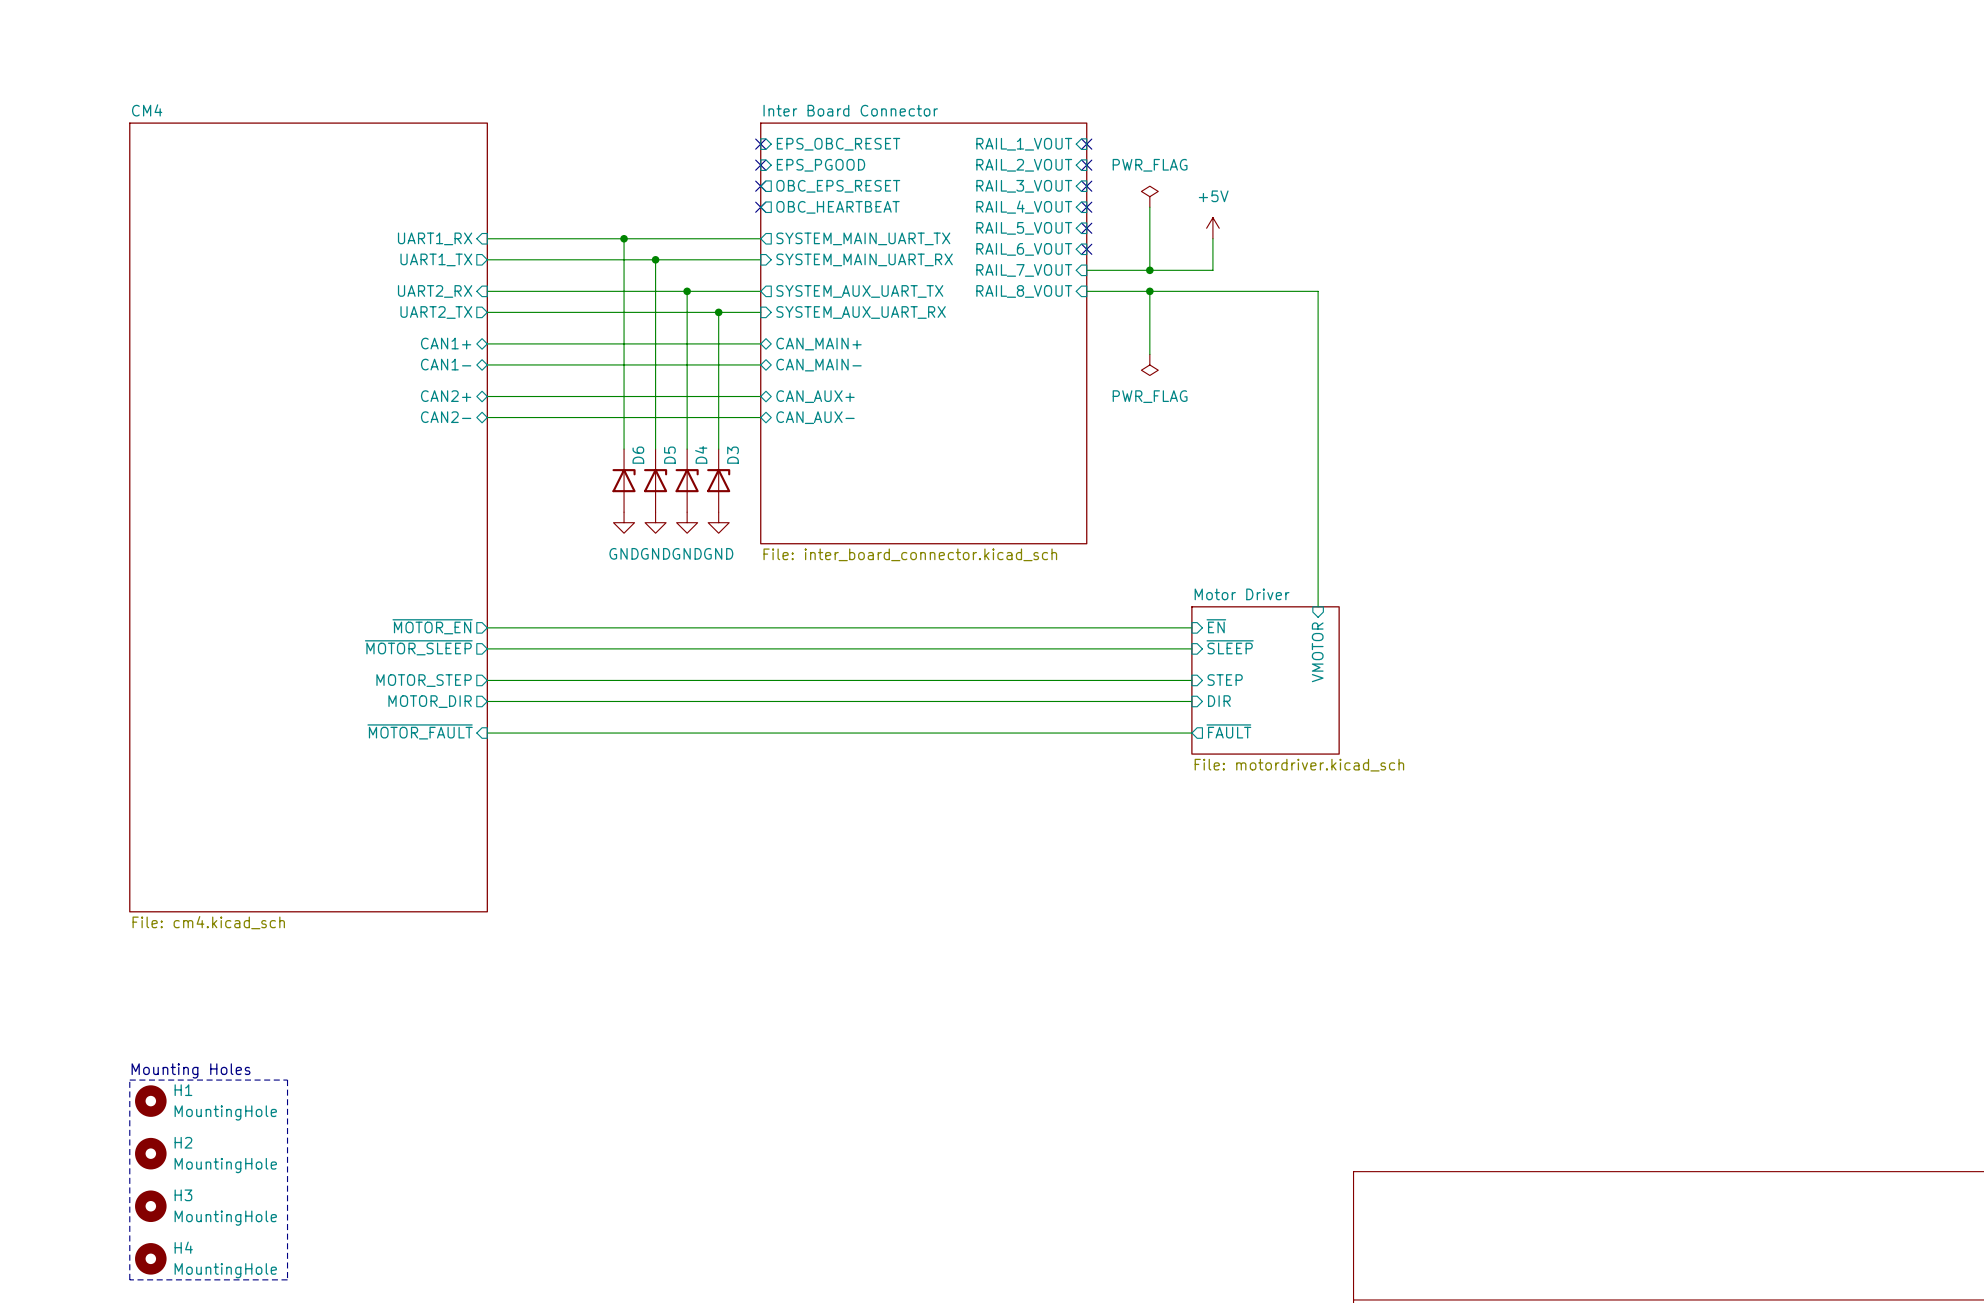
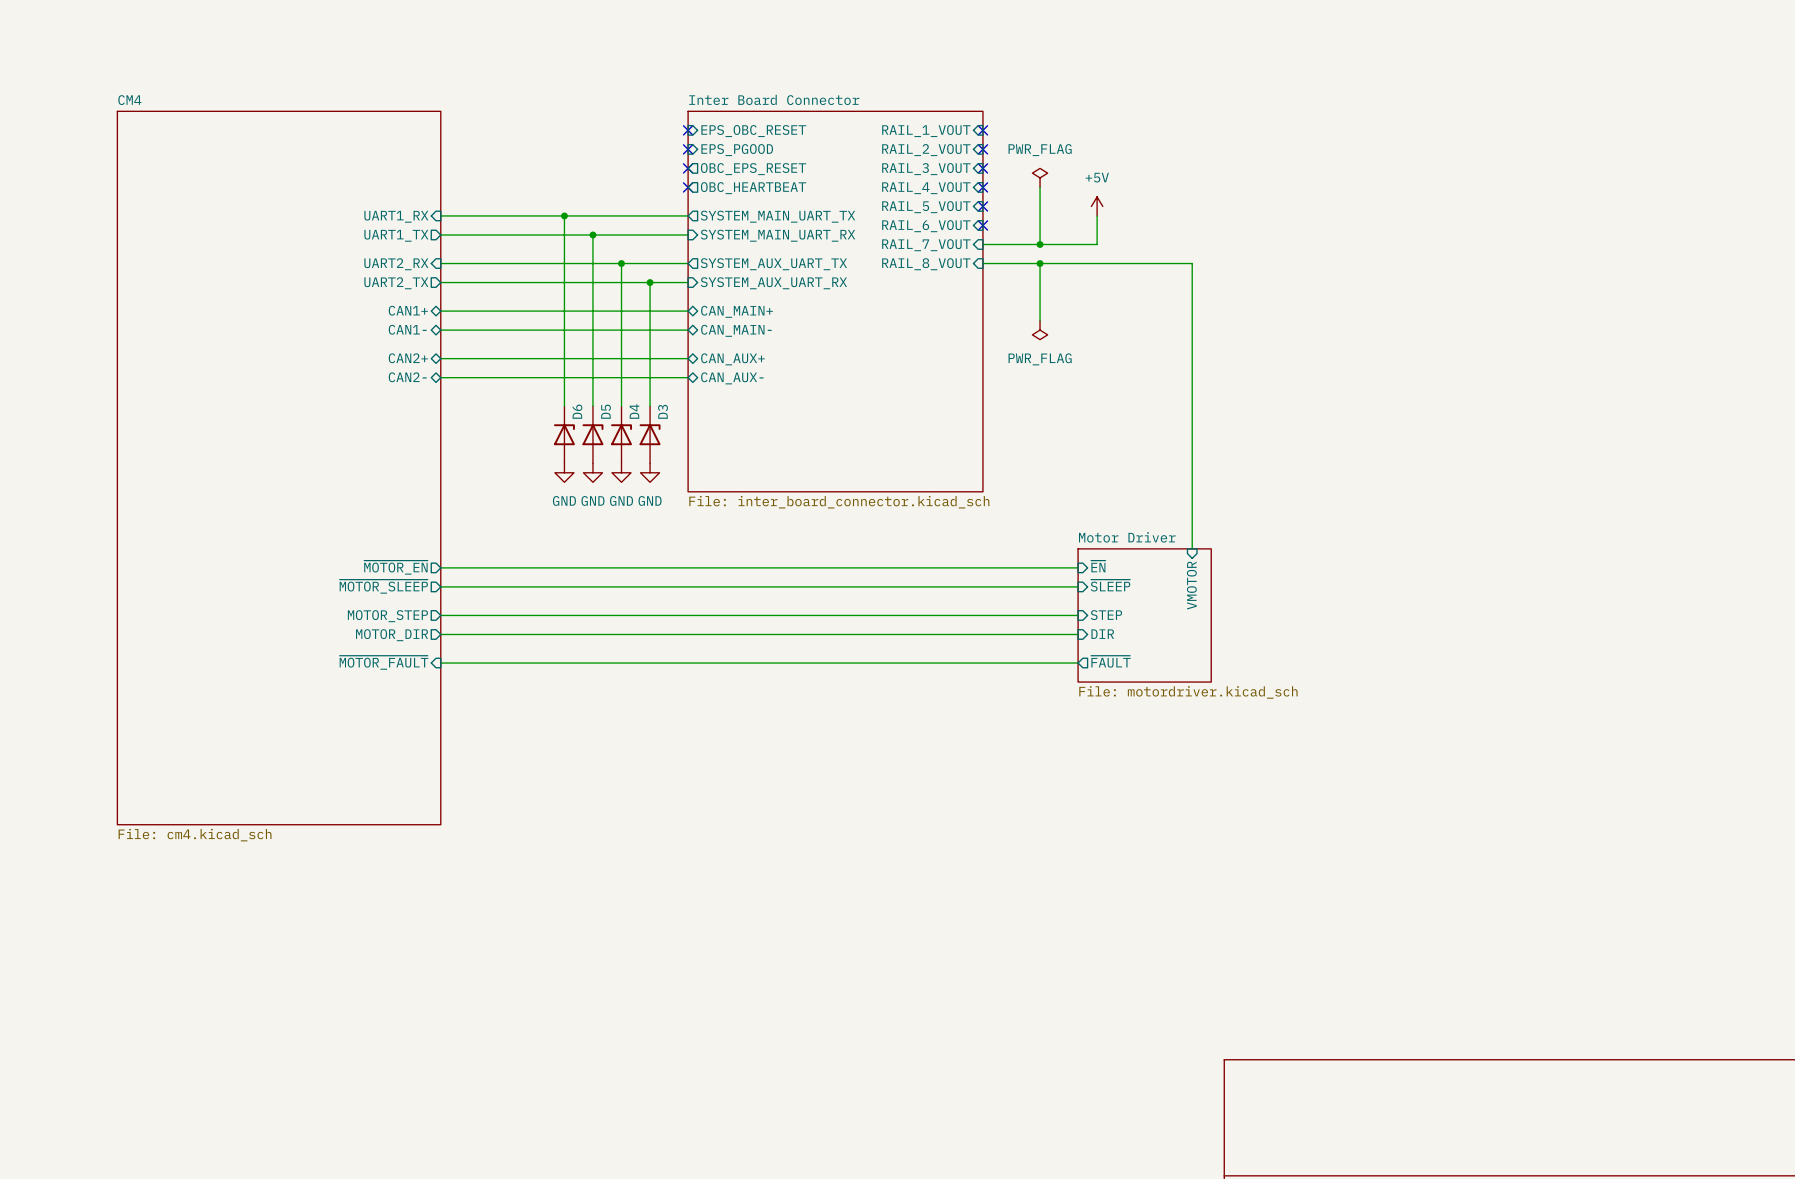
text: Mounting Holes (191, 1070) -> none
line: (129, 1080) (287, 1080) (287, 1279) (129, 1279) (129, 1080) -> none
H1: MountingHole (150, 1101) -> none
H2: MountingHole (150, 1153) -> none
H3: MountingHole (150, 1206) -> none
H4: MountingHole (150, 1258) -> none

